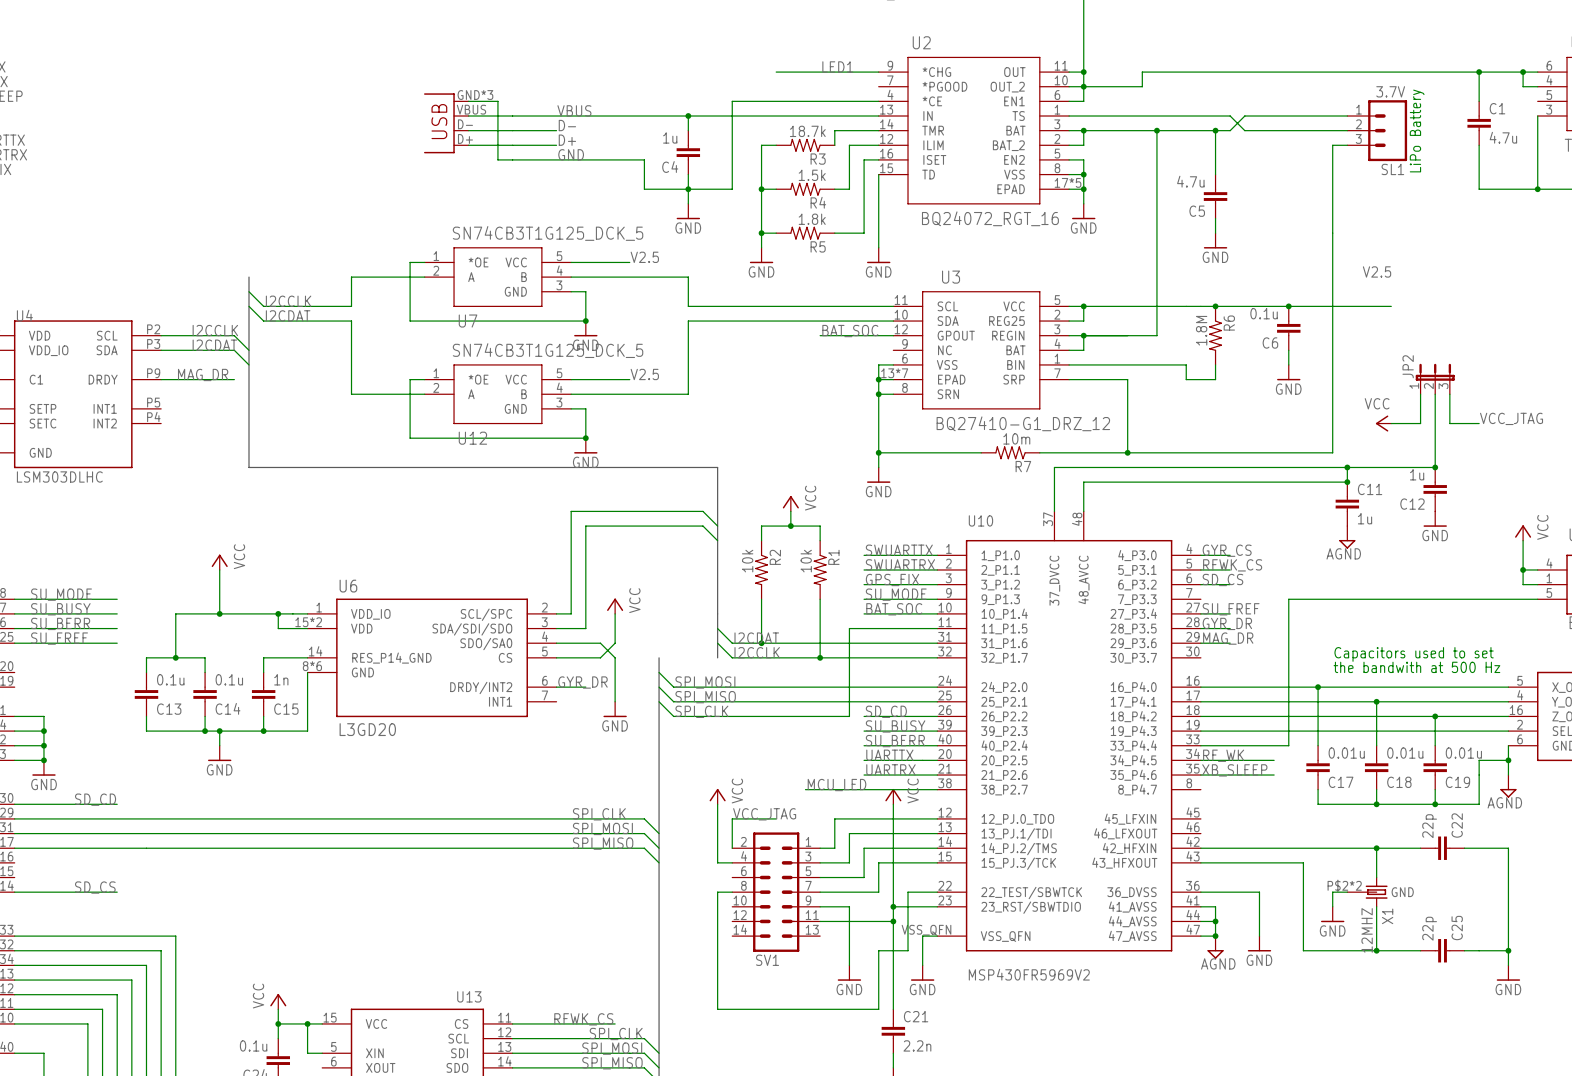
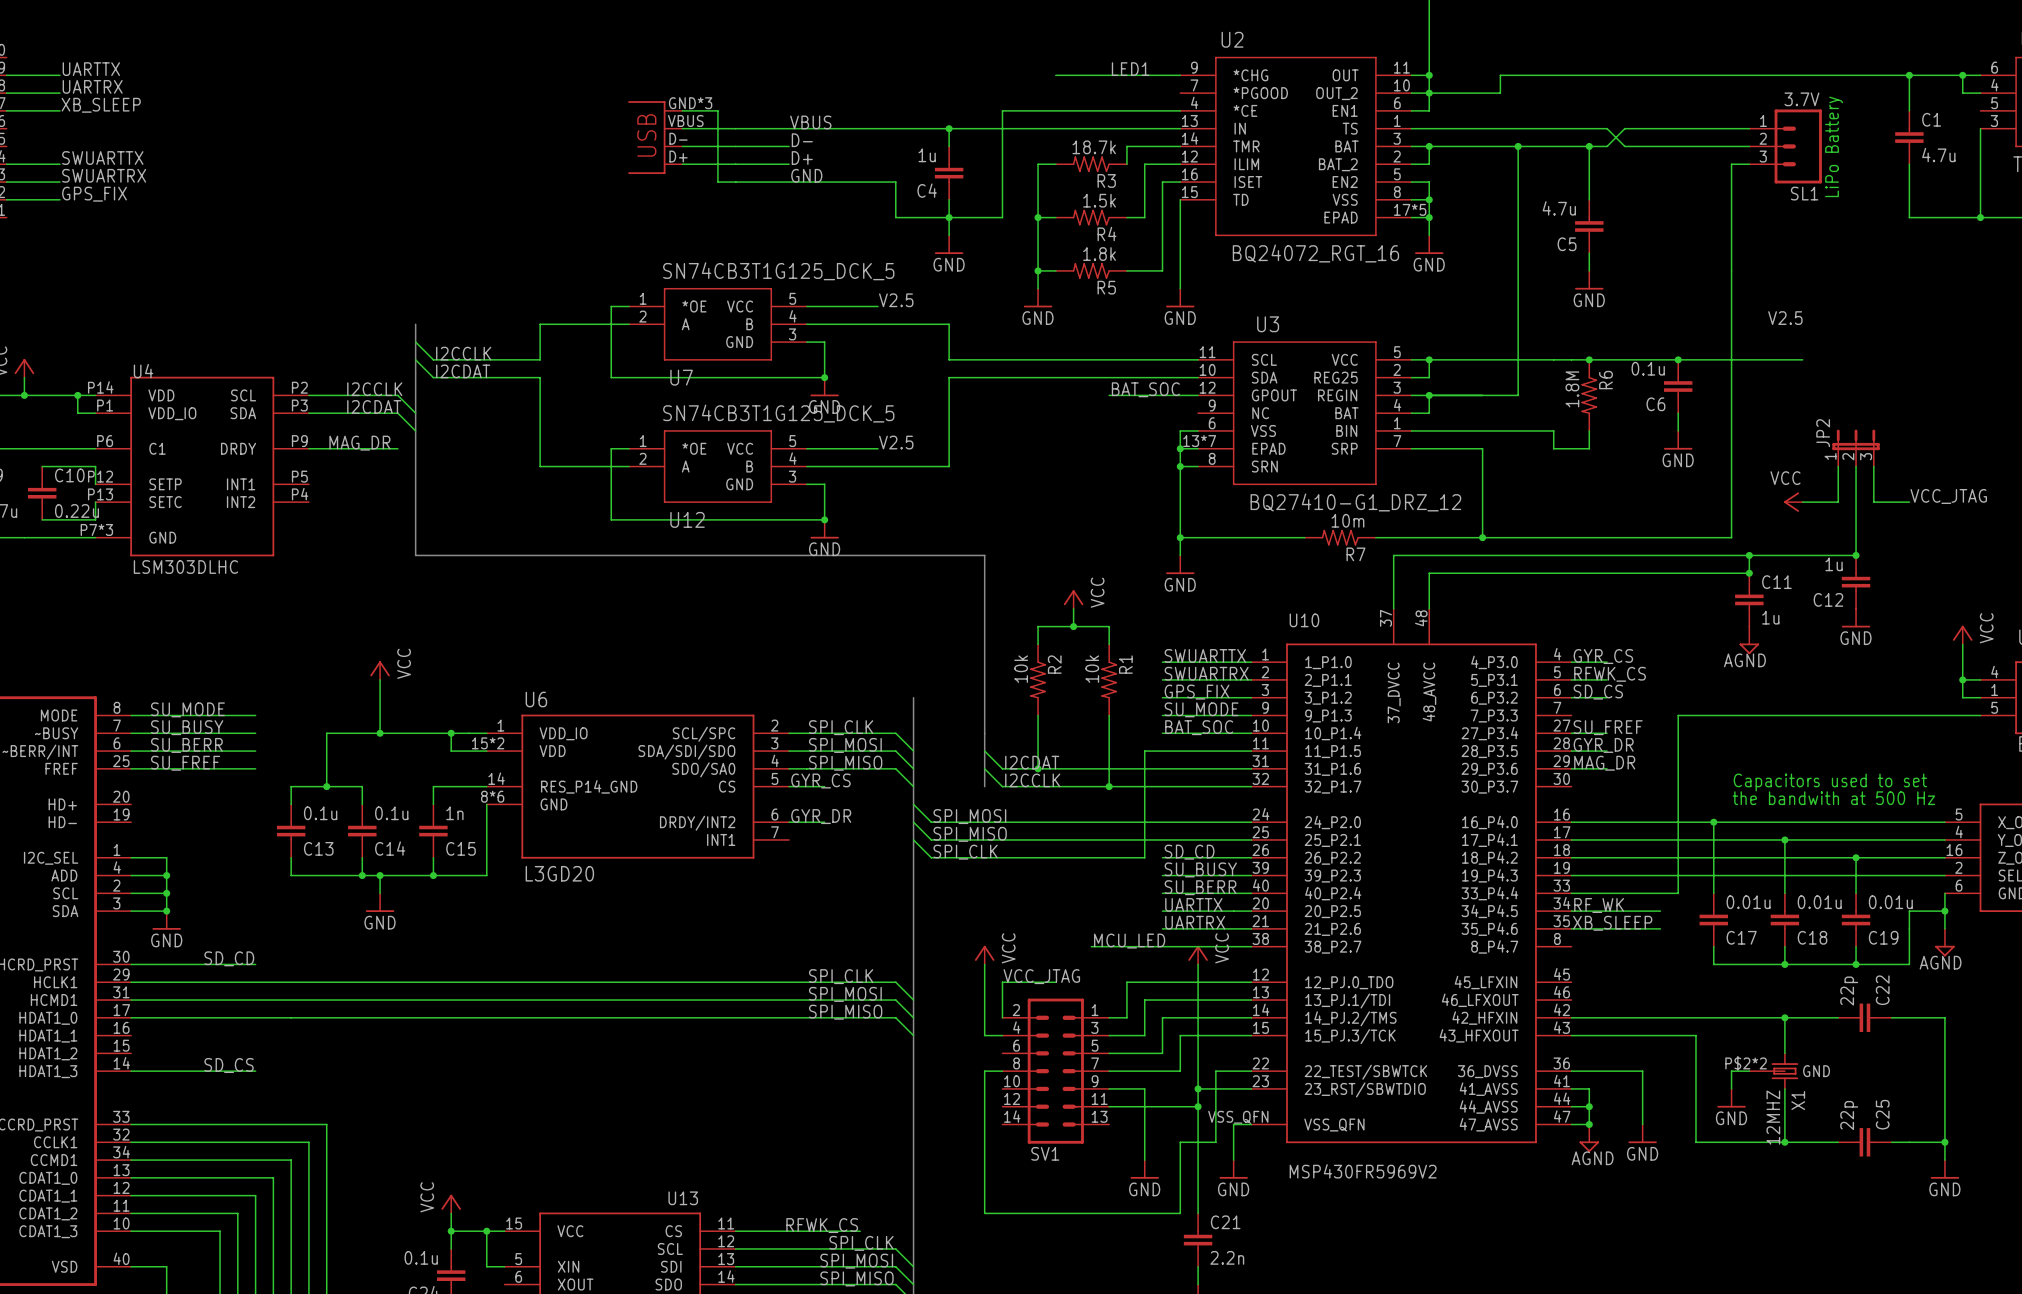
wire: (717, 526) (702, 511) (571, 511) (571, 613) -> (913, 751) (895, 733) (806, 733)
wire: (717, 540) (702, 526) (585, 526) (585, 628) -> (913, 768) (895, 751) (824, 751)
bus: none -> (913, 697) (913, 786)
power symbol: VCC (615, 606) -> none
label: none -> SPI_CLK (841, 727)
wire: (615, 613) (615, 643) (600, 657) (585, 657) -> none
label: none -> SPI_MOSI (845, 745)
label: none -> SPI_MISO (845, 763)
wire: (600, 643) (615, 657) (615, 701) -> (842, 768) (895, 768) (913, 786)
label: none -> GYR_CS (820, 781)
power symbol: GND (615, 709) -> none

